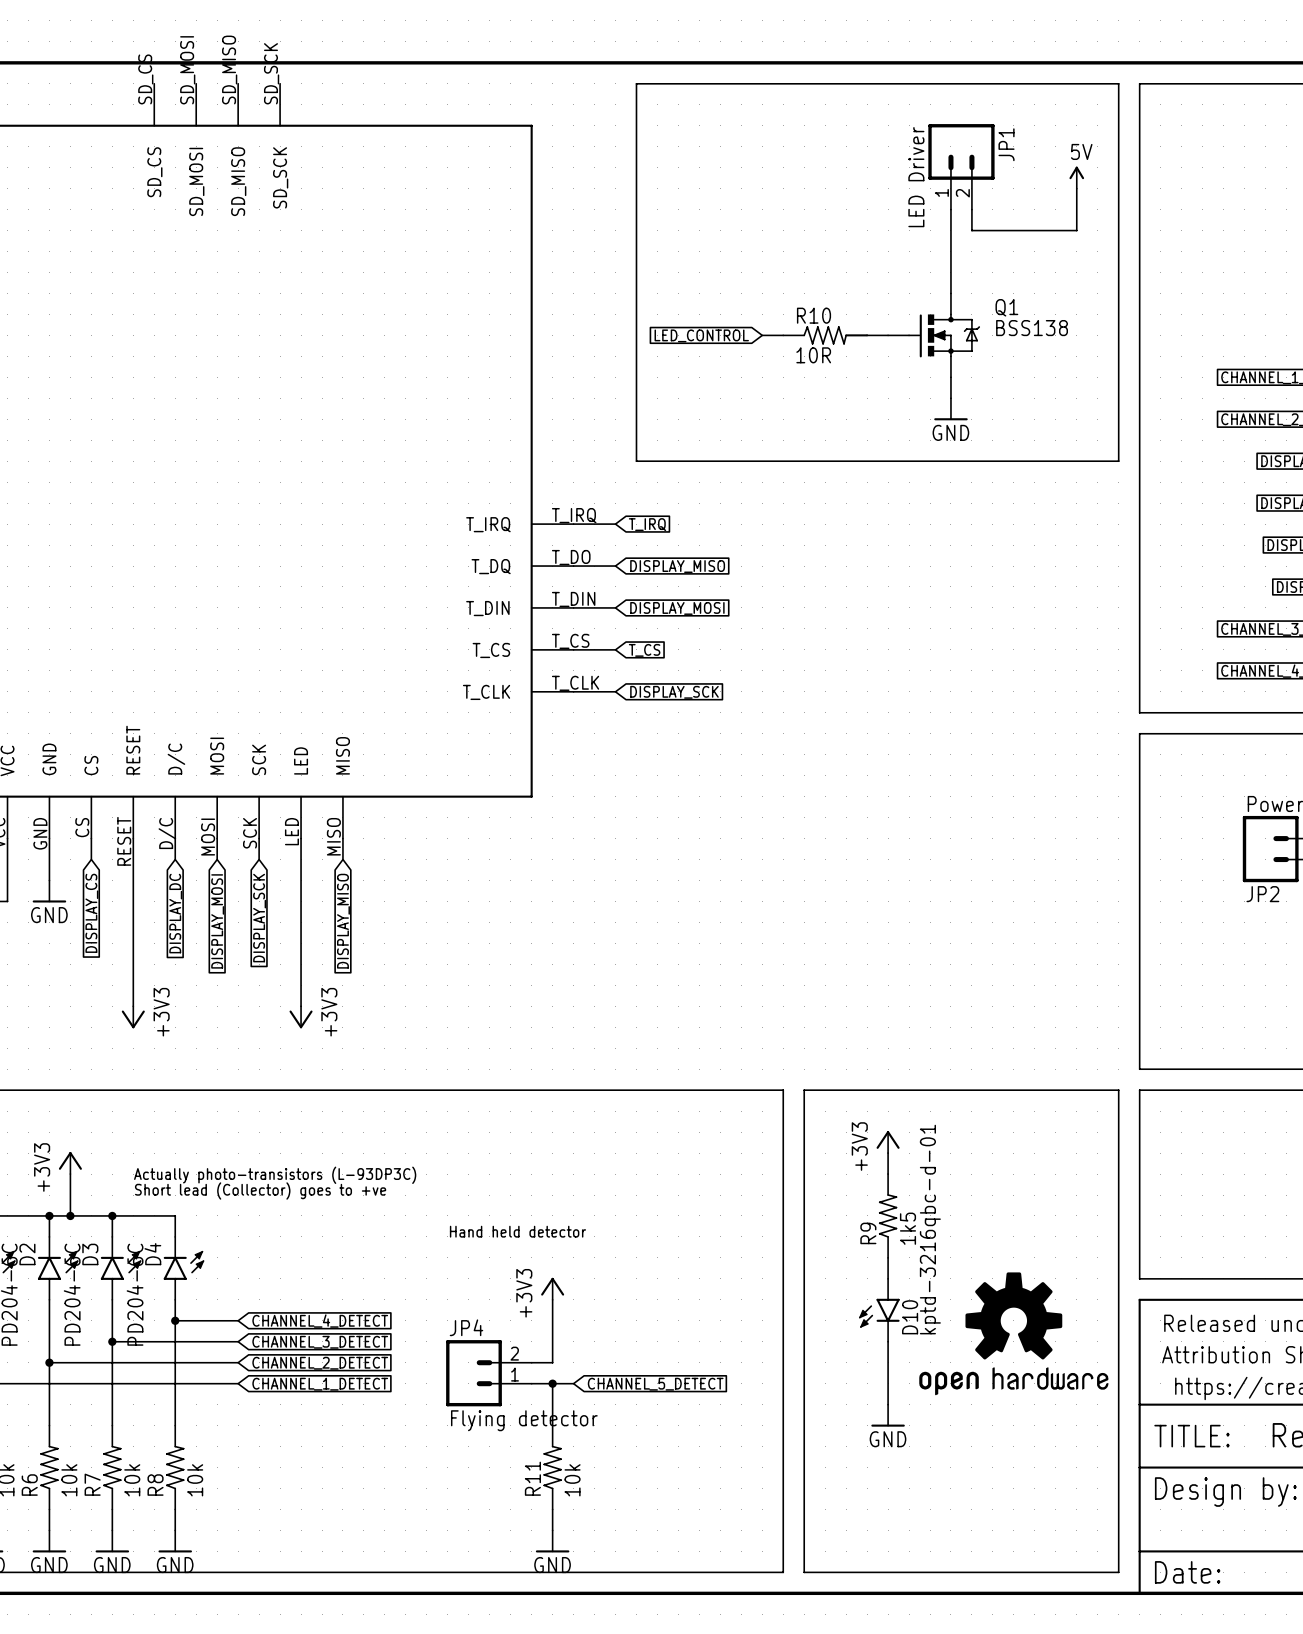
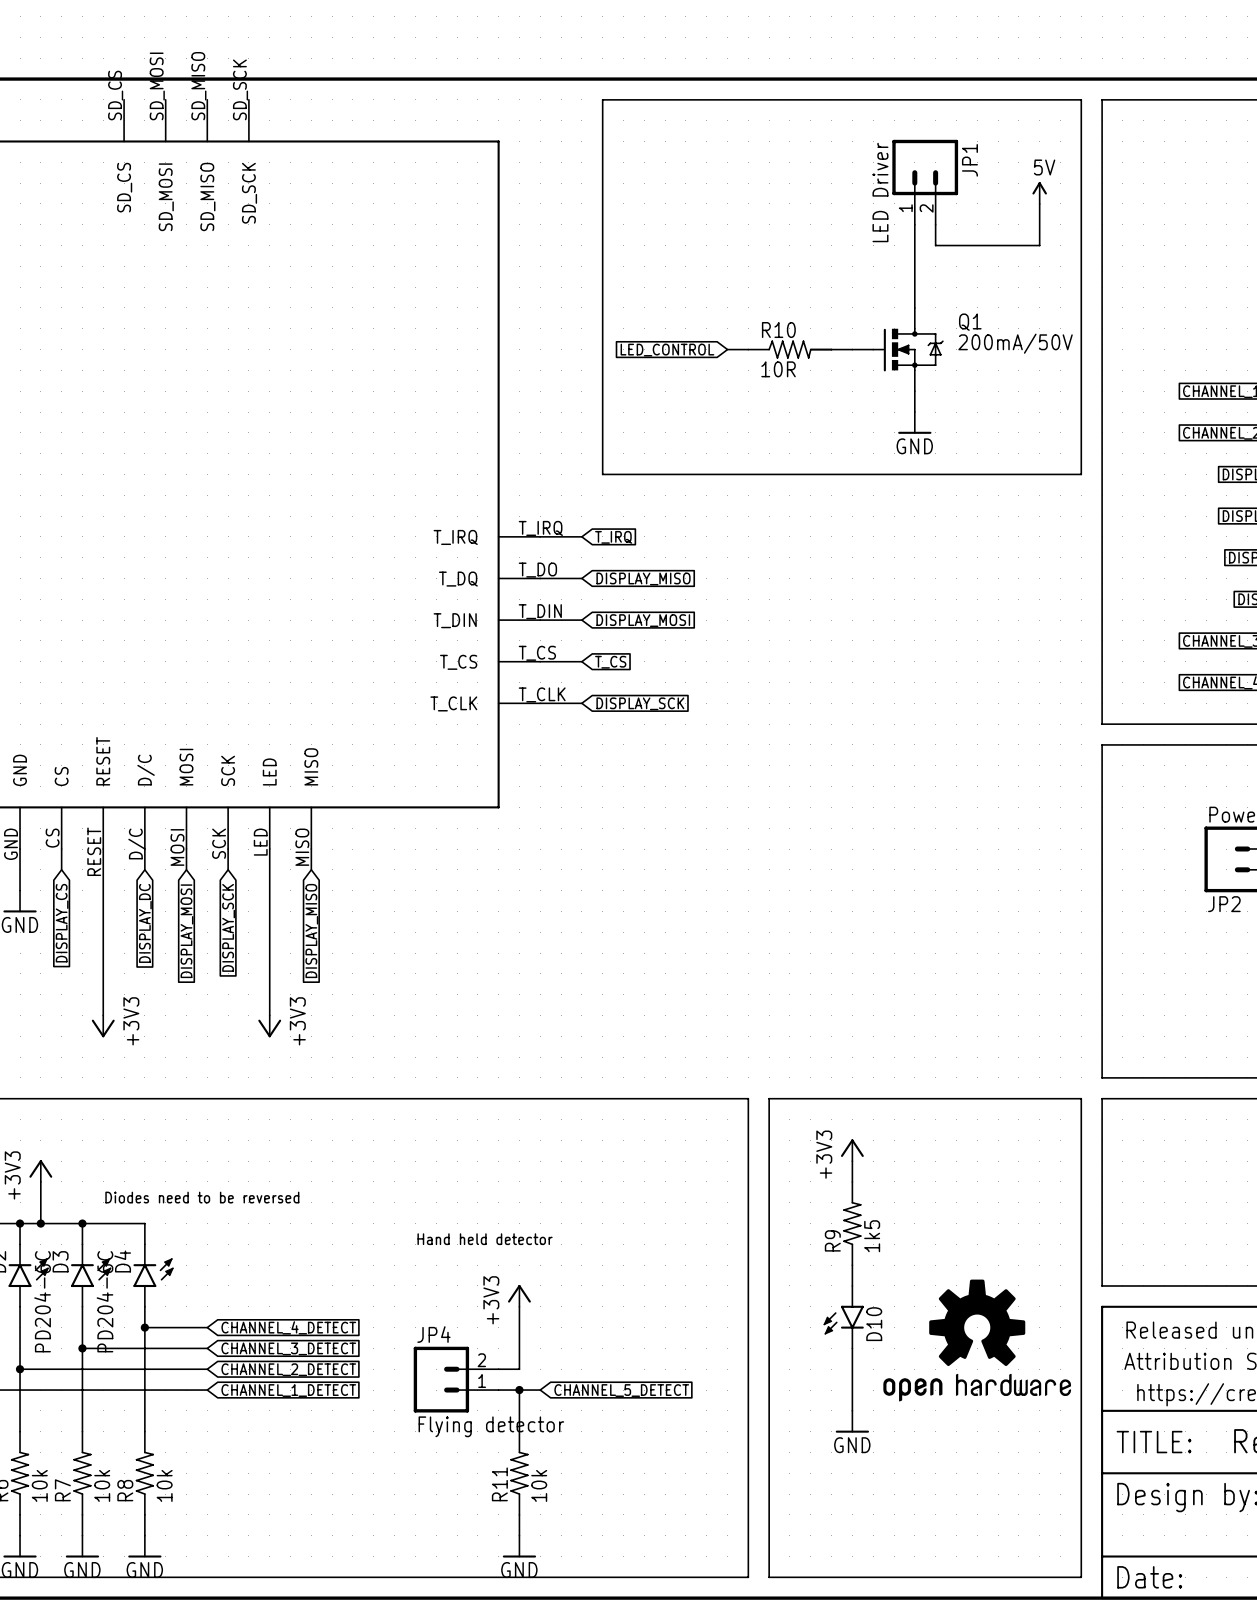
Q1 value: BSS138 (1032, 328) -> 200mA/50V (1015, 343)
text: Actually photo-transistors (L-93DP3C) (275, 1175) -> none
text: Short lead (Collector) goes to +ve (260, 1191) -> Diodes need to be reversed (202, 1197)
D10 value: kptd-3216qbc-d-01 (930, 1229) -> none

